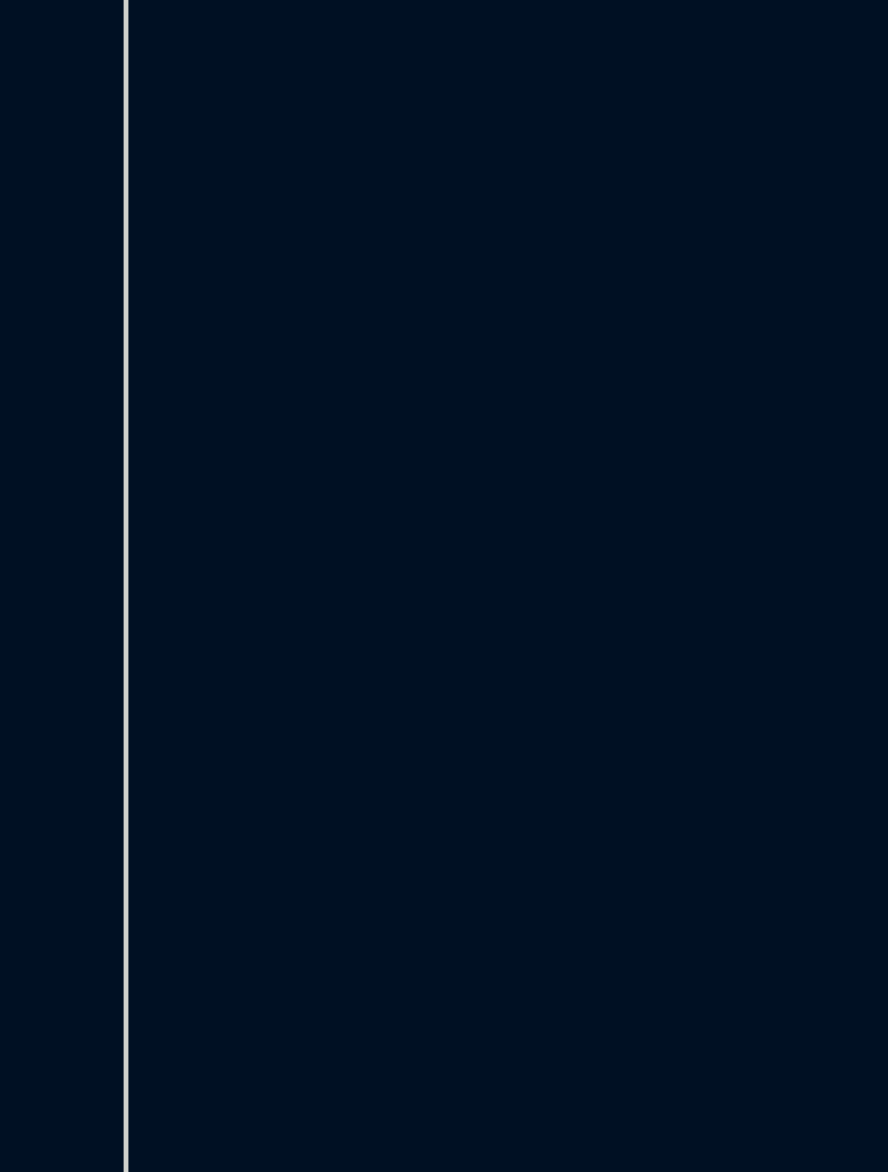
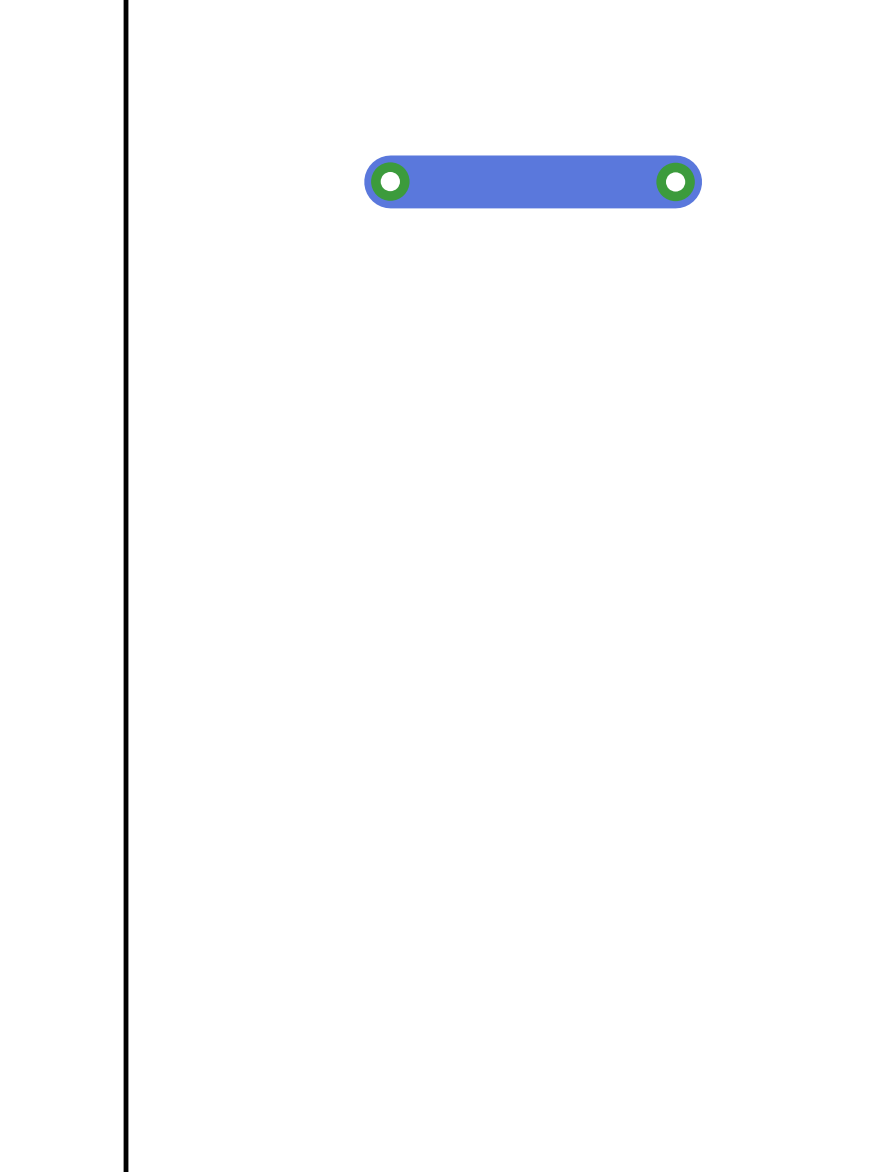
via: none -> (390, 181)
track: none -> (675, 181) (390, 181)
via: none -> (675, 181)

